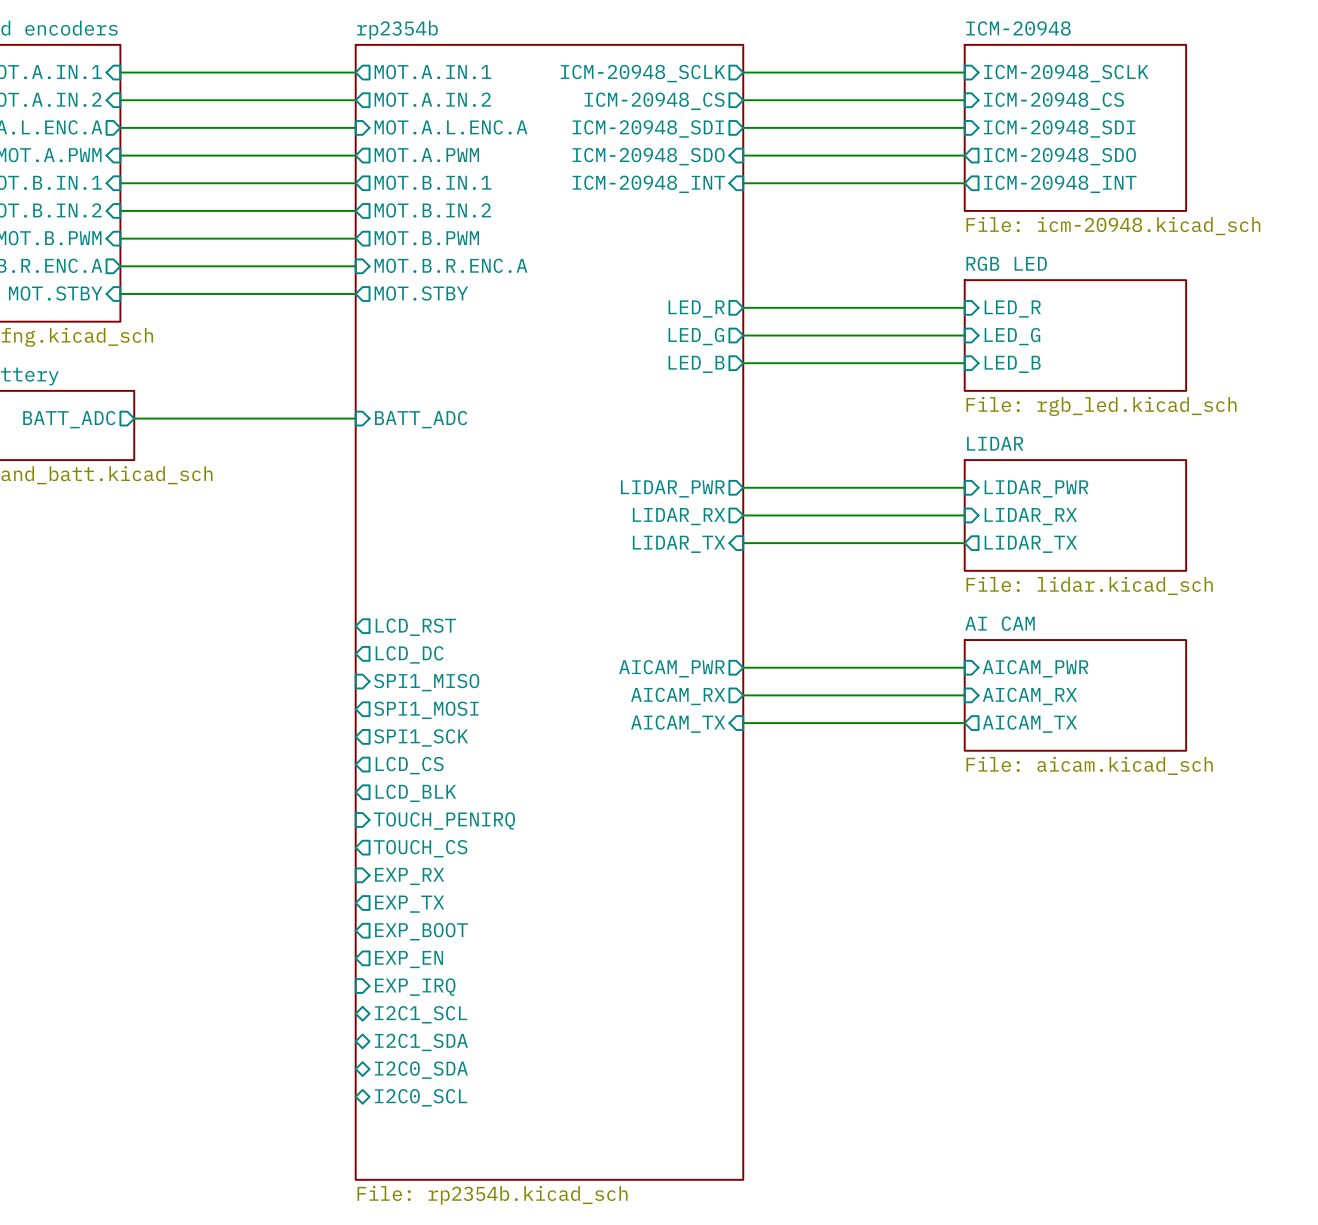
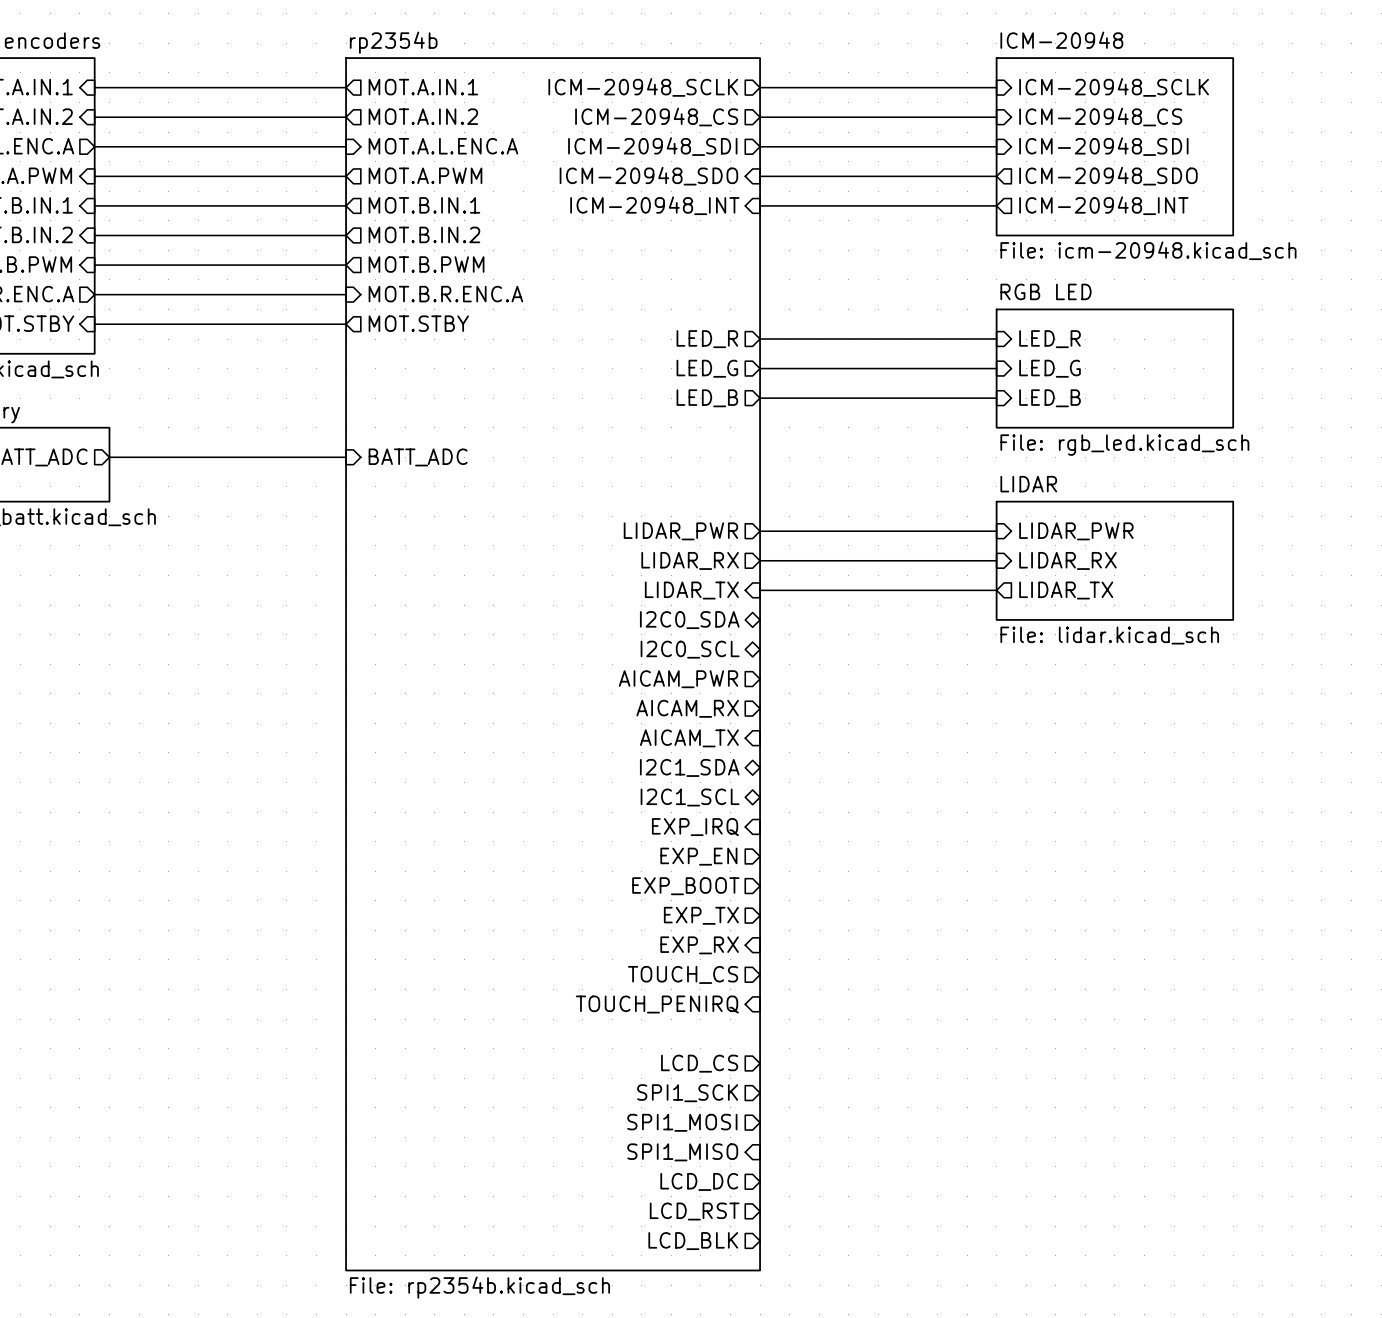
sheet pin: none -> I2C0_SDA (689, 620)
sheet pin: none -> I2C0_SCL (690, 649)
sheet pin: LCD_RST (415, 627) -> none
sheet pin: LCD_DC (409, 654) -> none
wire: (743, 667) (964, 667) -> none
sheet pin position: AICAM_PWR (671, 668) -> AICAM_PWR (678, 679)
sheet pin: AICAM_PWR (1035, 668) -> none
sheet pin: SPI1_MISO (426, 682) -> none
wire: (743, 695) (964, 695) -> none
sheet AI CAM: File: aicam.kicad_sch (1075, 695) -> none
sheet pin position: AICAM_RX (678, 696) -> AICAM_RX (687, 708)
sheet pin: AICAM_RX (1029, 696) -> none
sheet pin: SPI1_MOSI (426, 710) -> none
sheet pin: none -> I2C1_SDA (689, 767)
wire: (743, 723) (964, 723) -> none
sheet pin position: AICAM_TX (678, 724) -> AICAM_TX (689, 738)
sheet pin: AICAM_TX (1029, 724) -> none
sheet pin: SPI1_SCK (421, 737) -> none
sheet pin: none -> I2C1_SCL (690, 797)
sheet pin: LCD_CS (409, 765) -> none
sheet pin: none -> EXP_IRQ (695, 827)
sheet pin: LCD_BLK (415, 793) -> none
sheet pin: none -> EXP_EN (698, 856)
sheet pin: TOUCH_PENIRQ (444, 821) -> none
sheet pin: none -> EXP_BOOT (685, 886)
sheet pin: TOUCH_CS (420, 848) -> none
sheet pin: none -> EXP_TX (701, 915)
sheet pin: EXP_RX (409, 876) -> none
sheet pin: none -> EXP_RX (699, 945)
sheet pin: EXP_TX (409, 904) -> none
sheet pin: none -> TOUCH_CS (683, 974)
sheet pin: EXP_BOOT (421, 931) -> none
sheet pin: none -> TOUCH_PENIRQ (657, 1004)
sheet pin: EXP_EN (409, 959) -> none
sheet pin: EXP_IRQ (415, 987) -> none
sheet pin: none -> LCD_CS (699, 1063)
sheet pin: I2C1_SCL (421, 1014) -> none
sheet pin: none -> SPI1_SCK (687, 1093)
sheet pin: I2C1_SDA (421, 1042) -> none
sheet pin: none -> SPI1_MOSI (682, 1122)
sheet pin: I2C0_SDA (421, 1070) -> none
sheet pin: none -> SPI1_MISO (682, 1152)
sheet pin: I2C0_SCL (421, 1097) -> none
sheet pin: none -> LCD_DC (699, 1181)
sheet pin: none -> LCD_RST (694, 1211)
sheet pin: none -> LCD_BLK (693, 1241)

